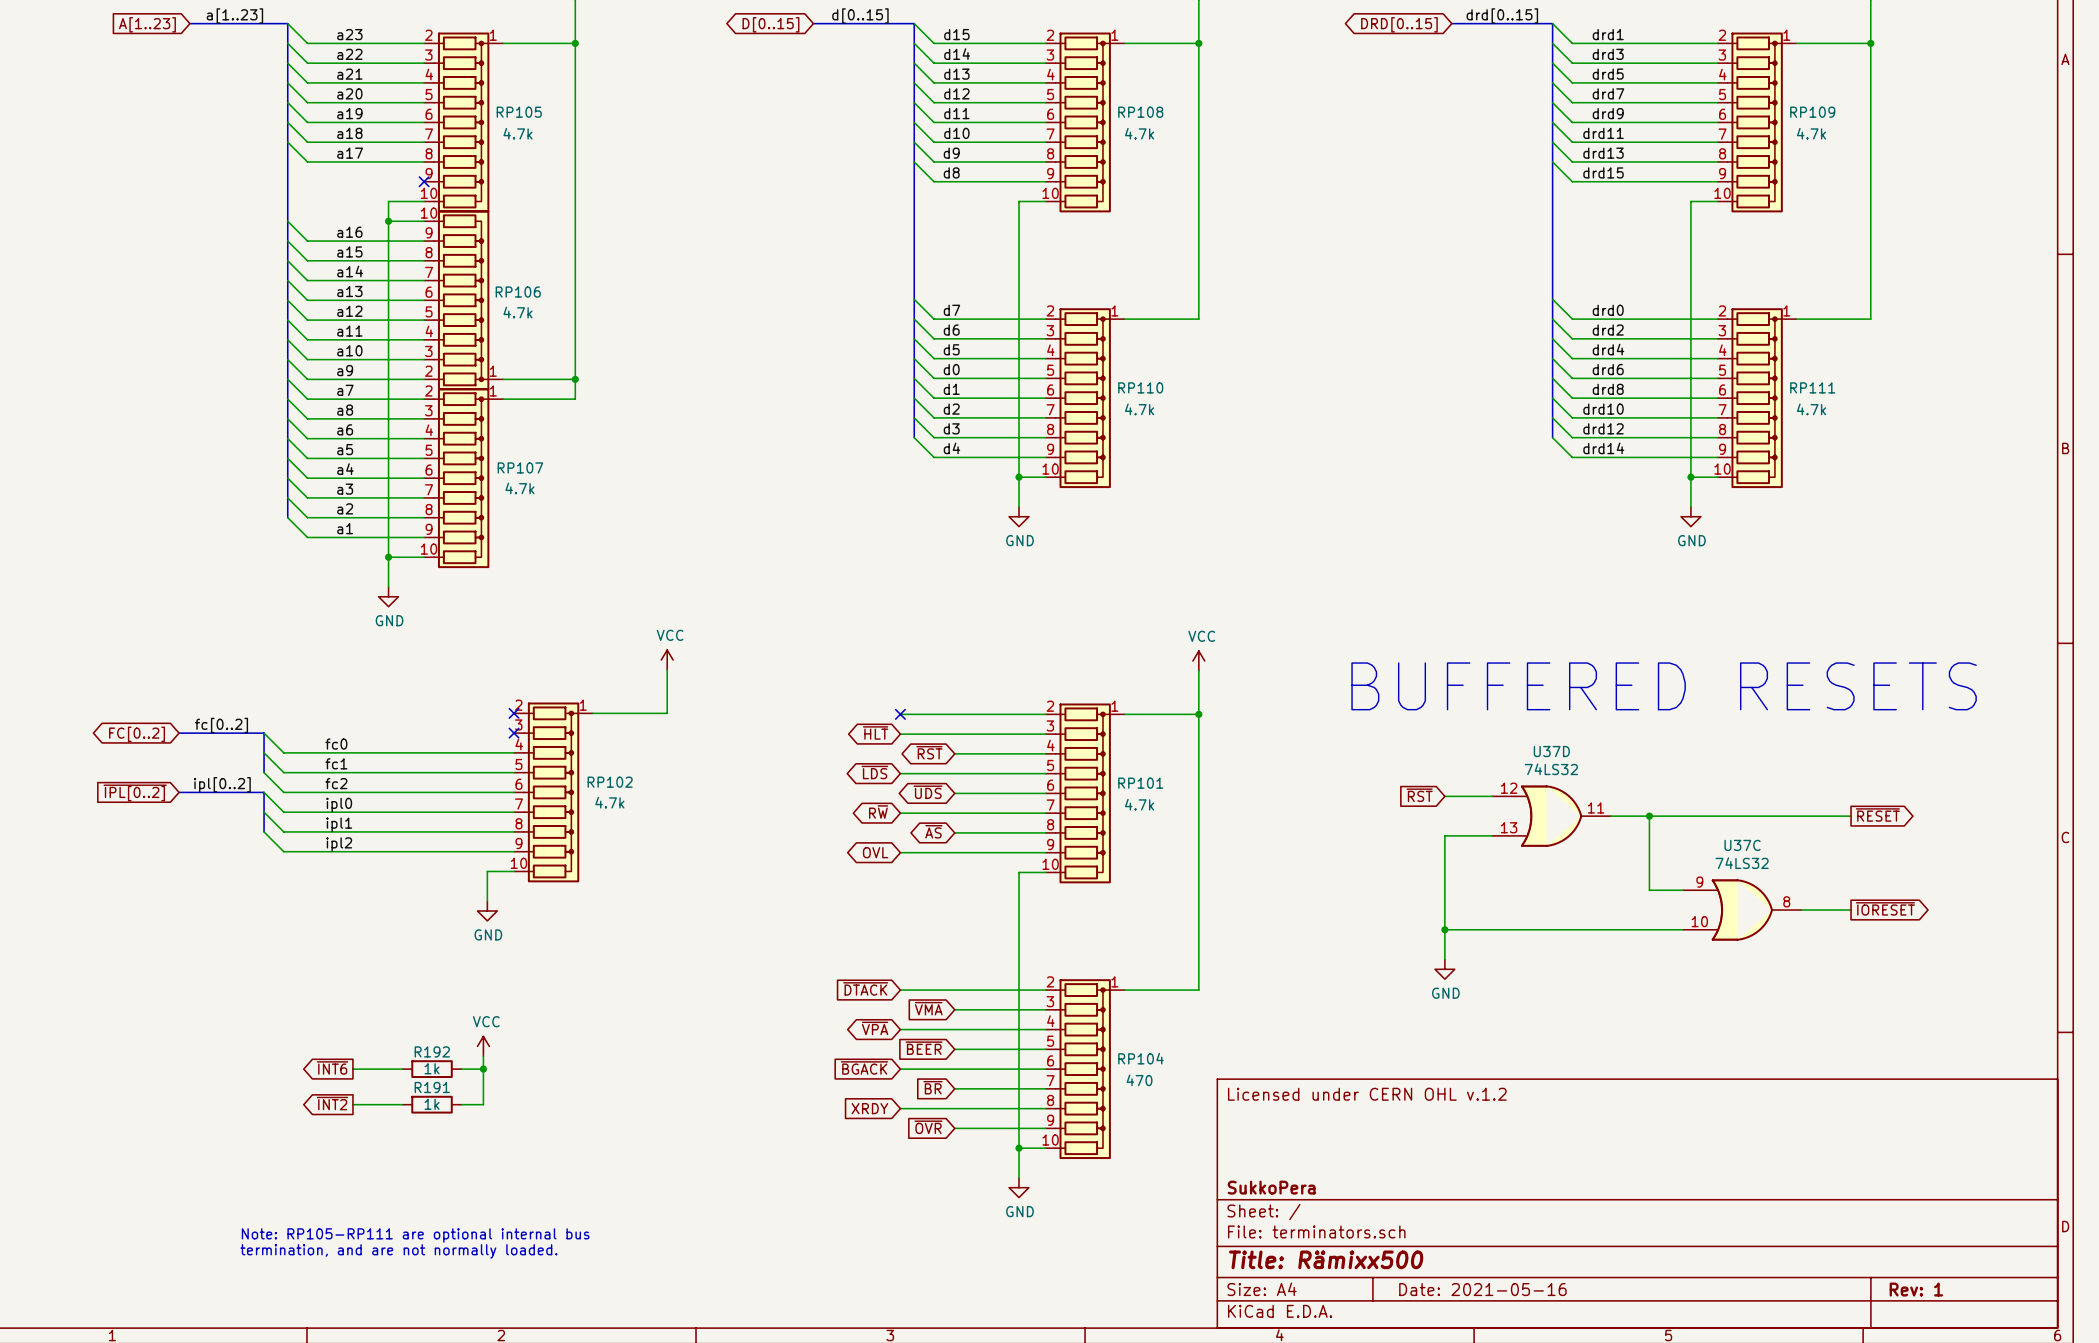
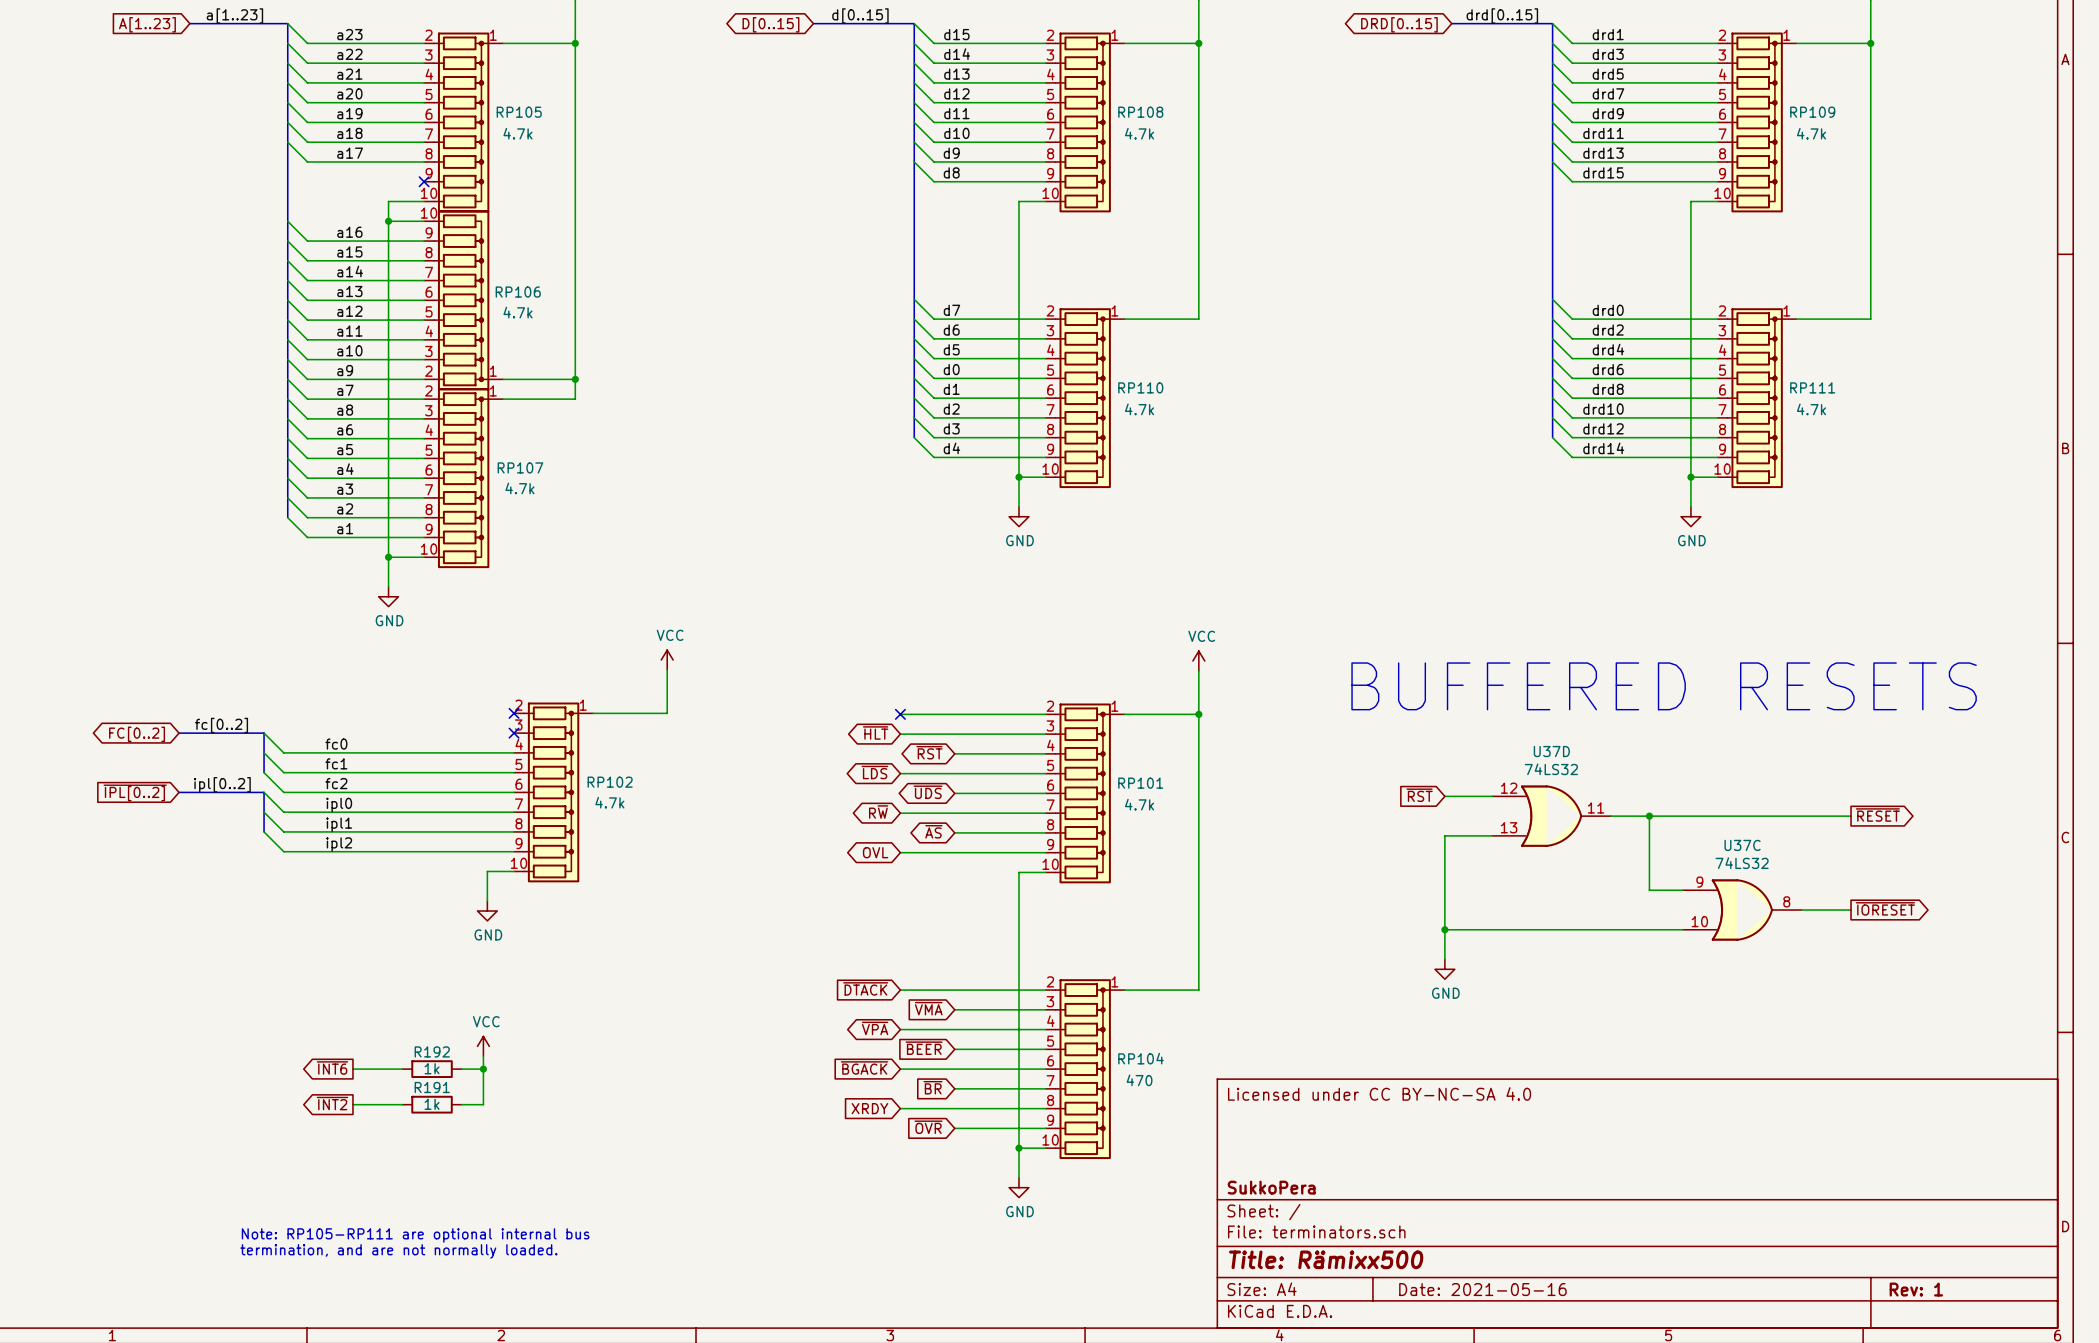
title block: Licensed under CERN OHL v.1.2 (1367, 1094) -> Licensed under CC BY-NC-SA 4.0 (1379, 1093)

